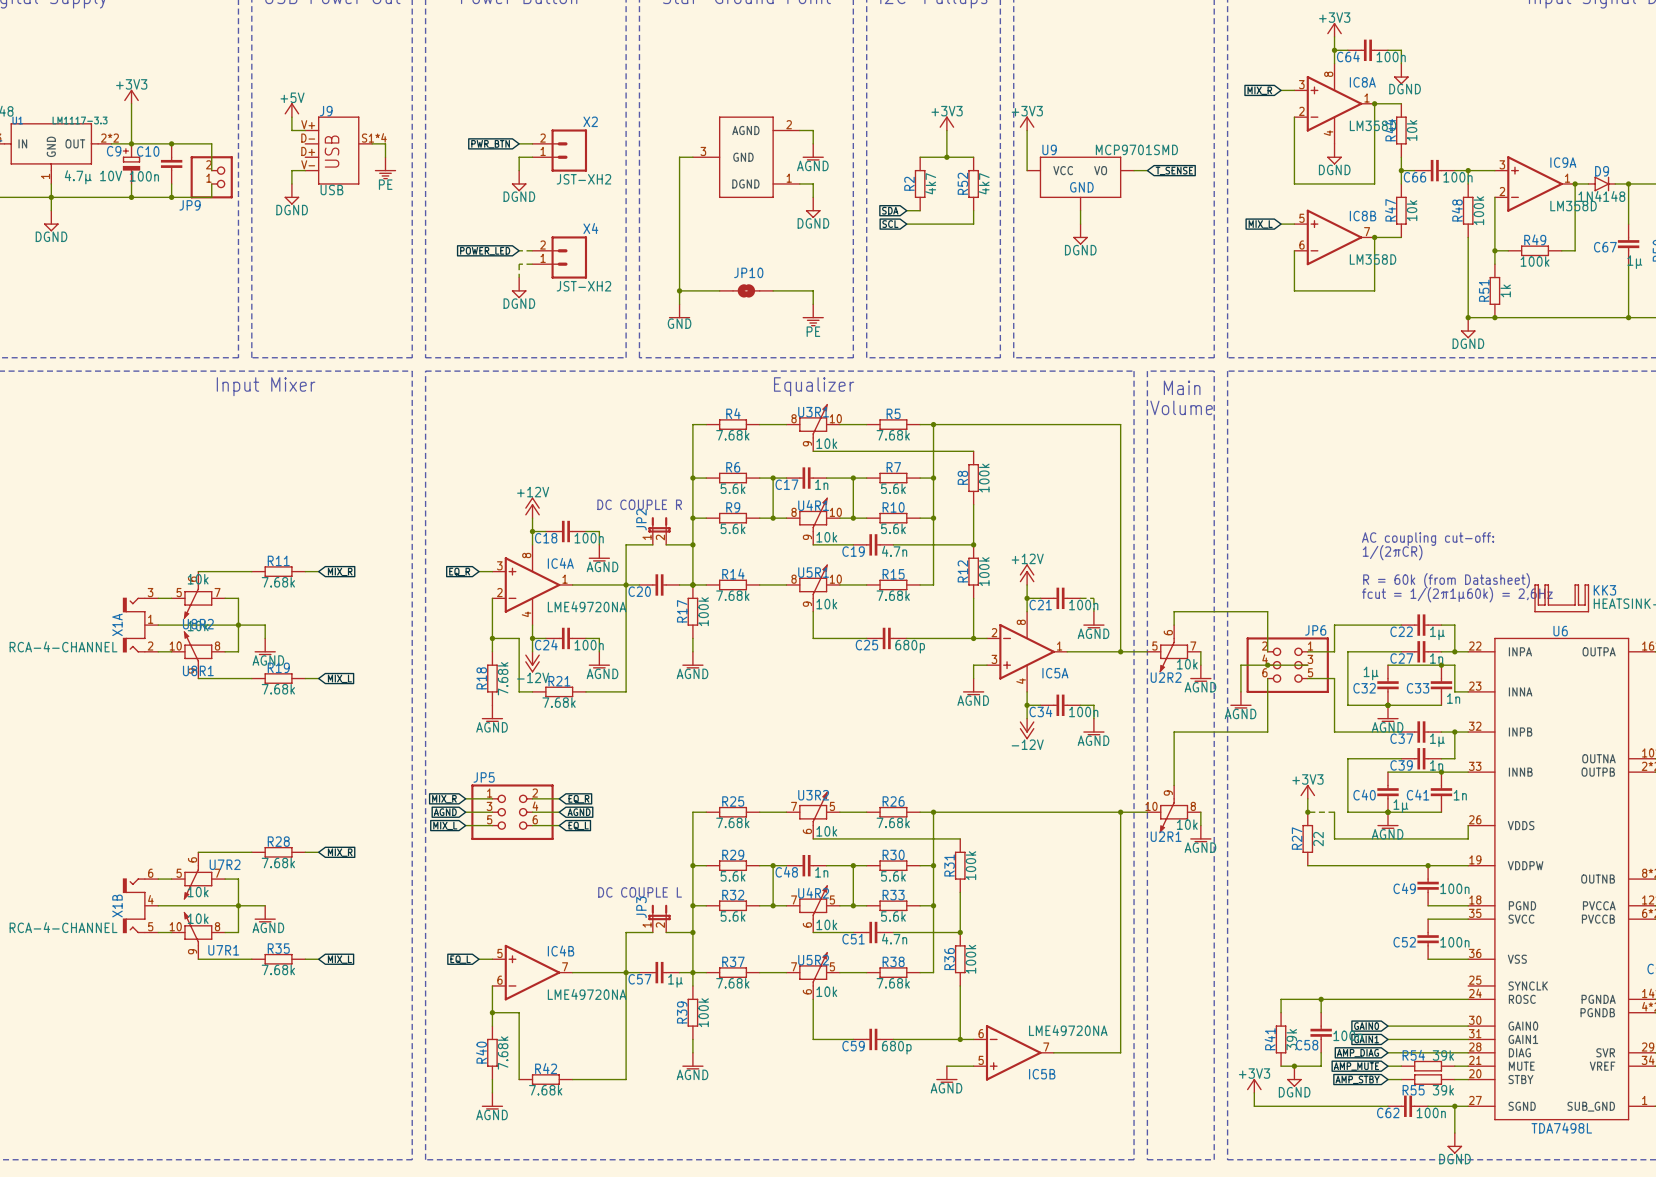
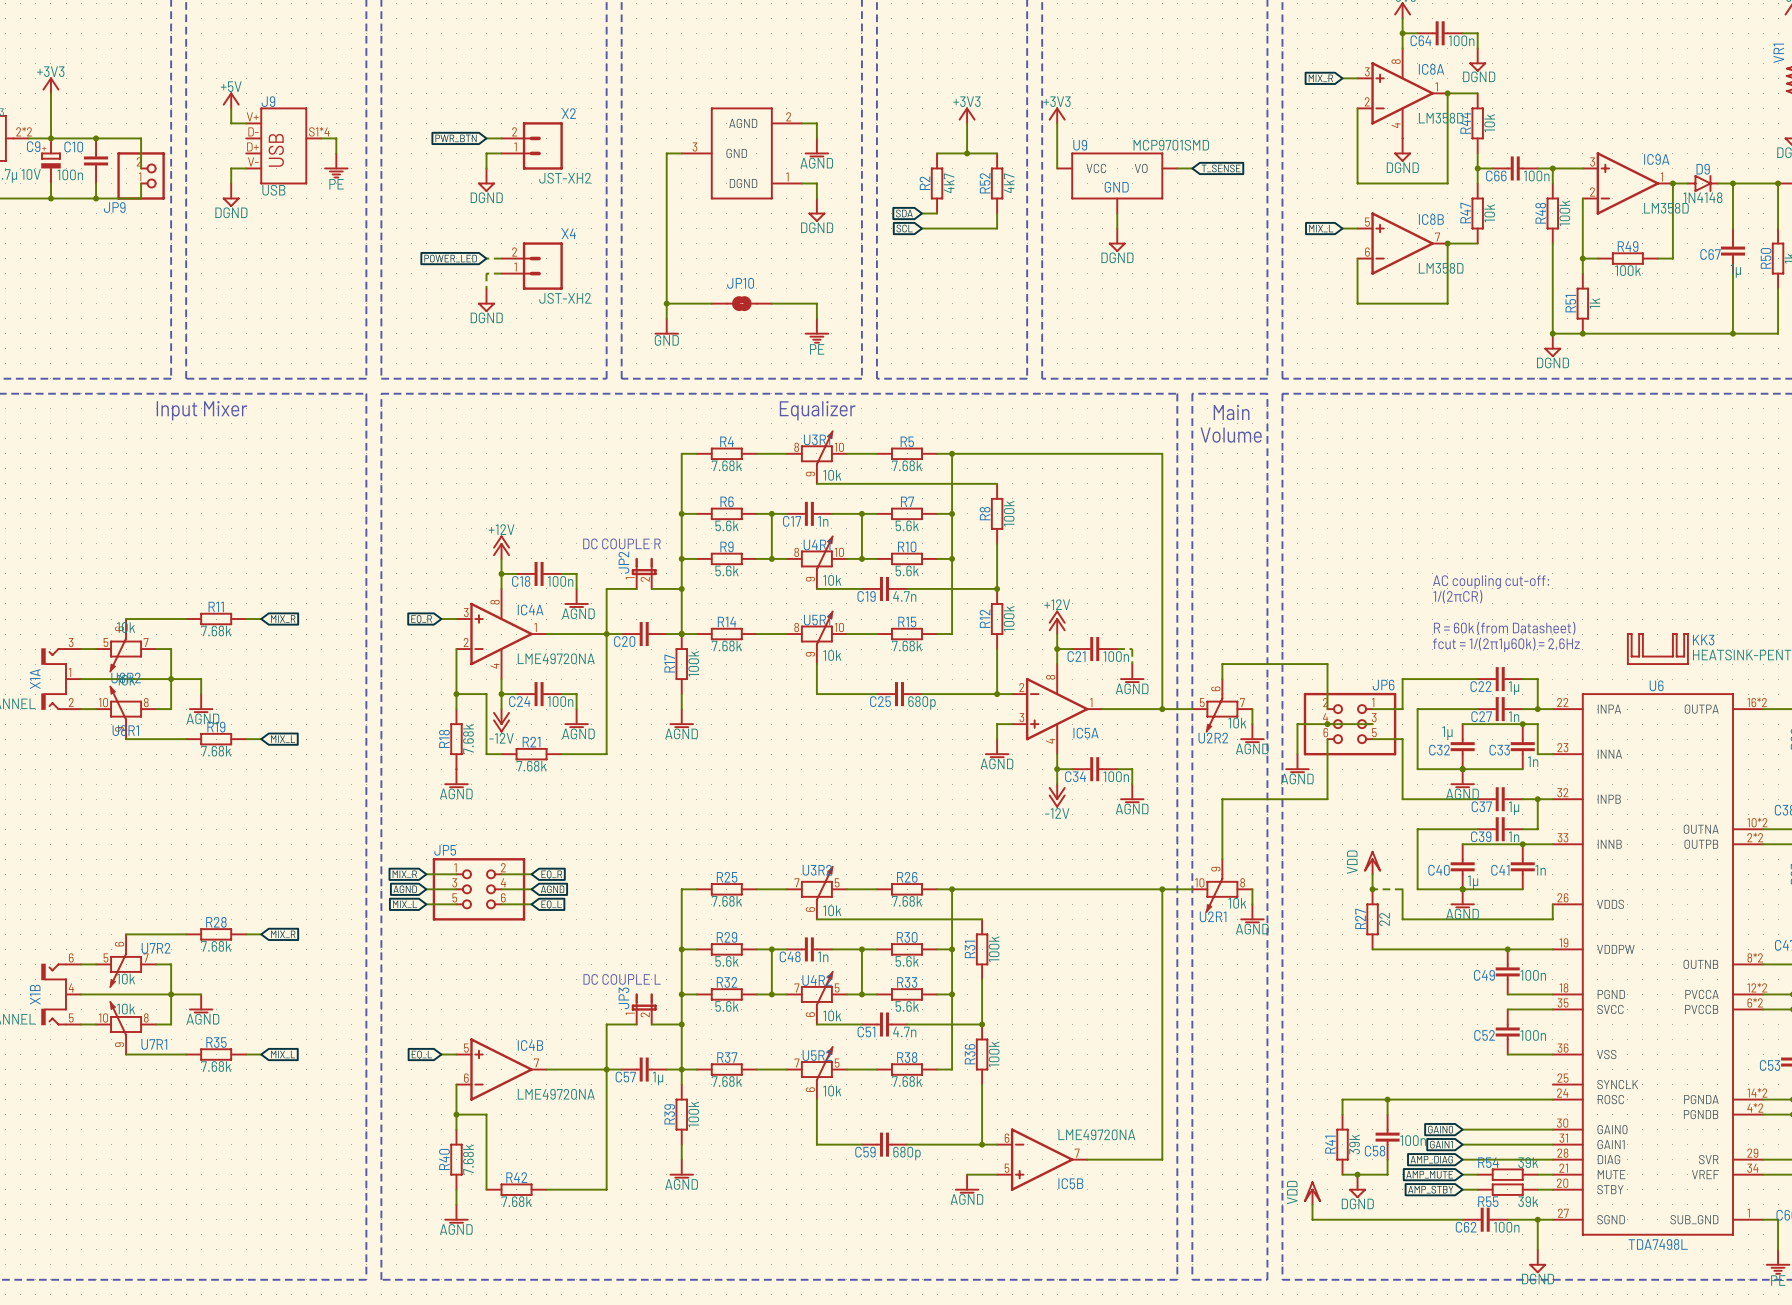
power symbol: +3V3 (1307, 791) -> VDD (1372, 862)
power symbol: +3V3 (1254, 1085) -> VDD (1312, 1193)

